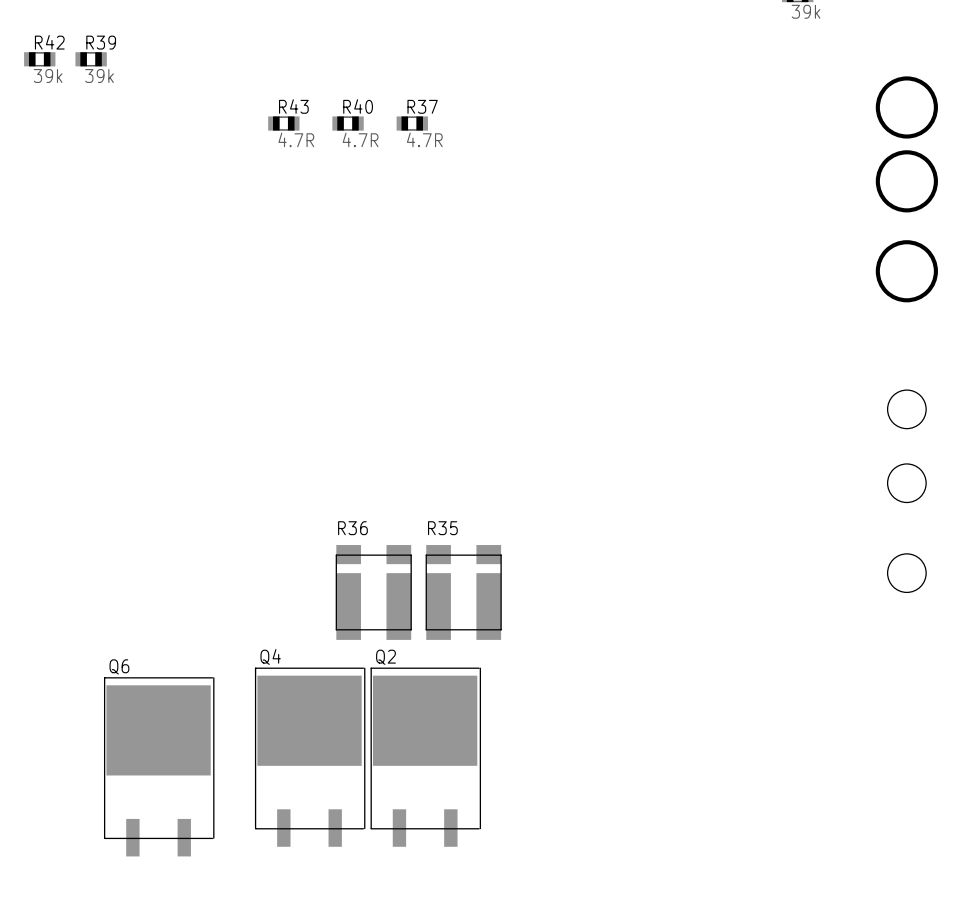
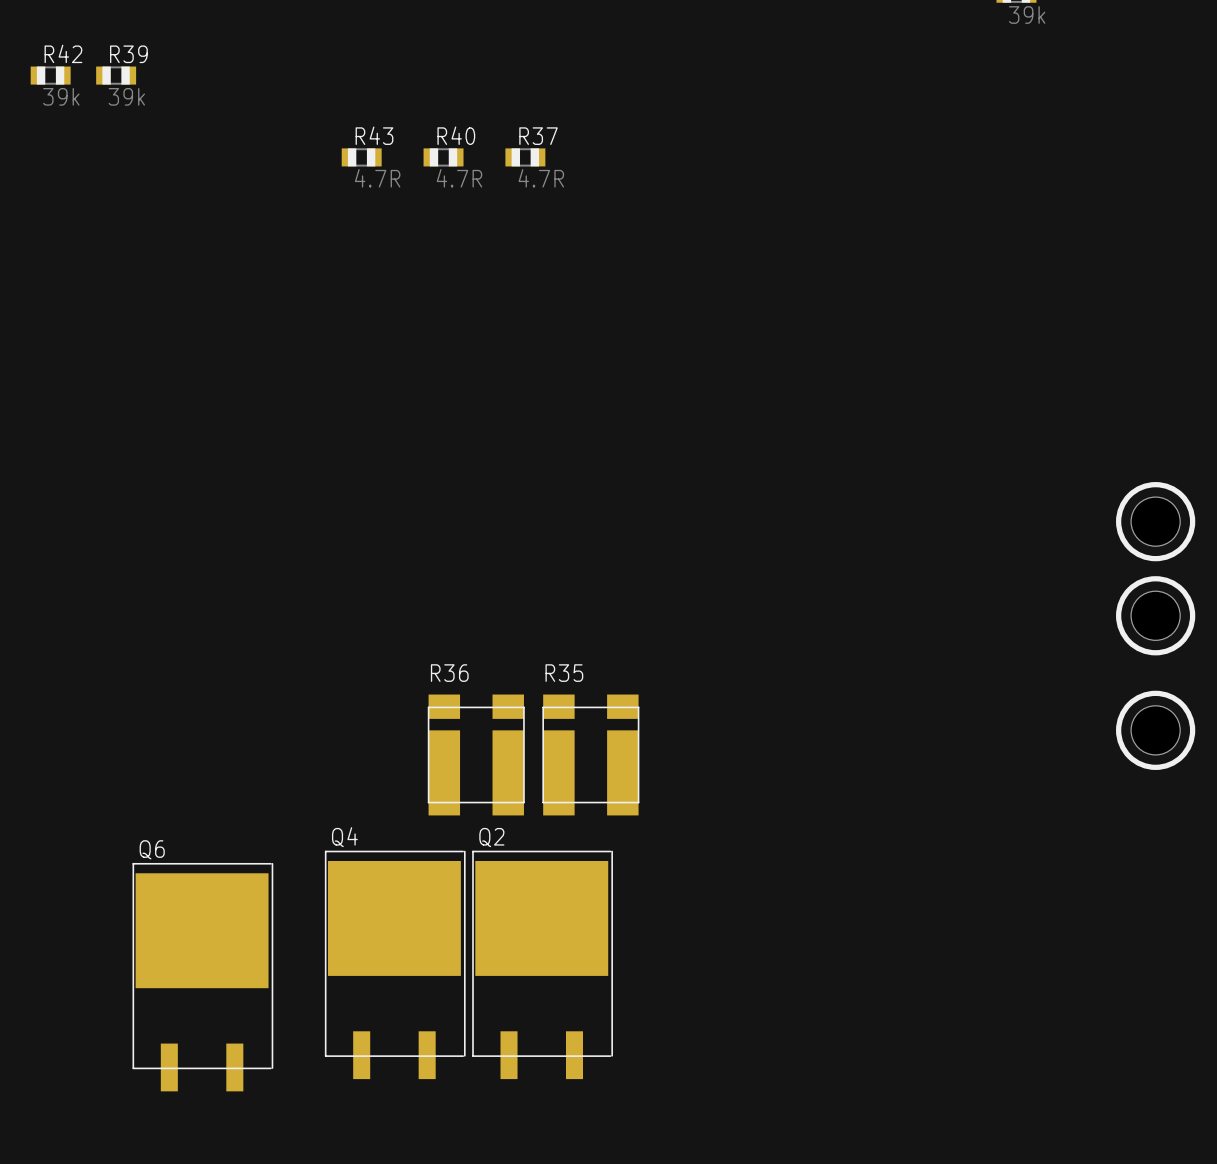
drawing: [875, 76, 938, 213] -> none
drawing: [875, 240, 938, 303] -> none
drawing: none -> [1116, 482, 1196, 656]
drawing: none -> [1116, 690, 1196, 770]

